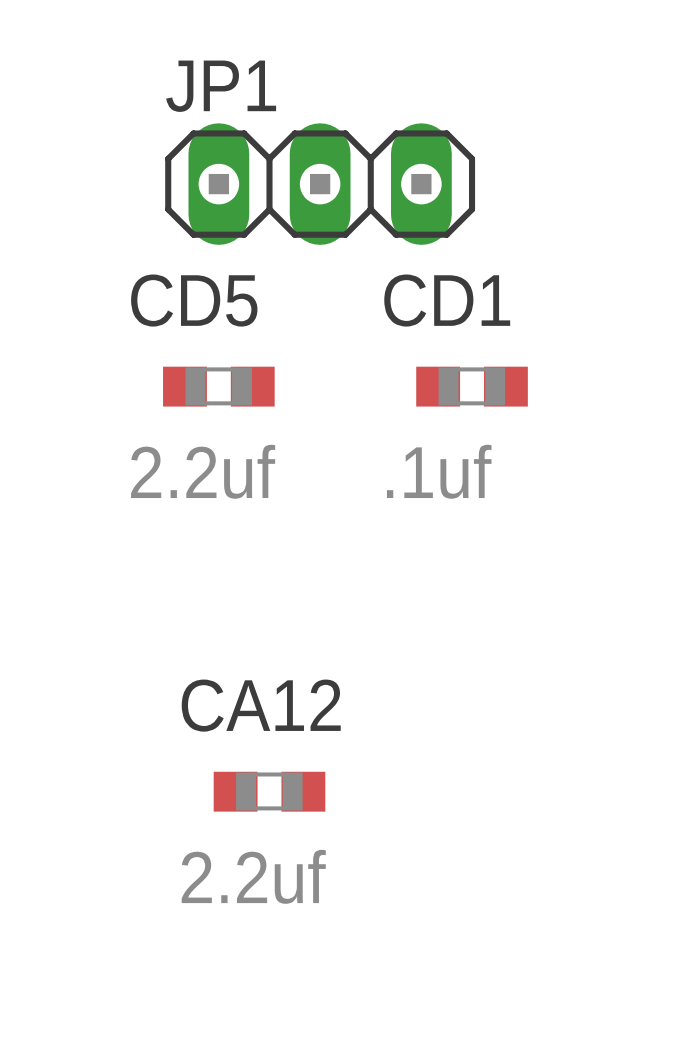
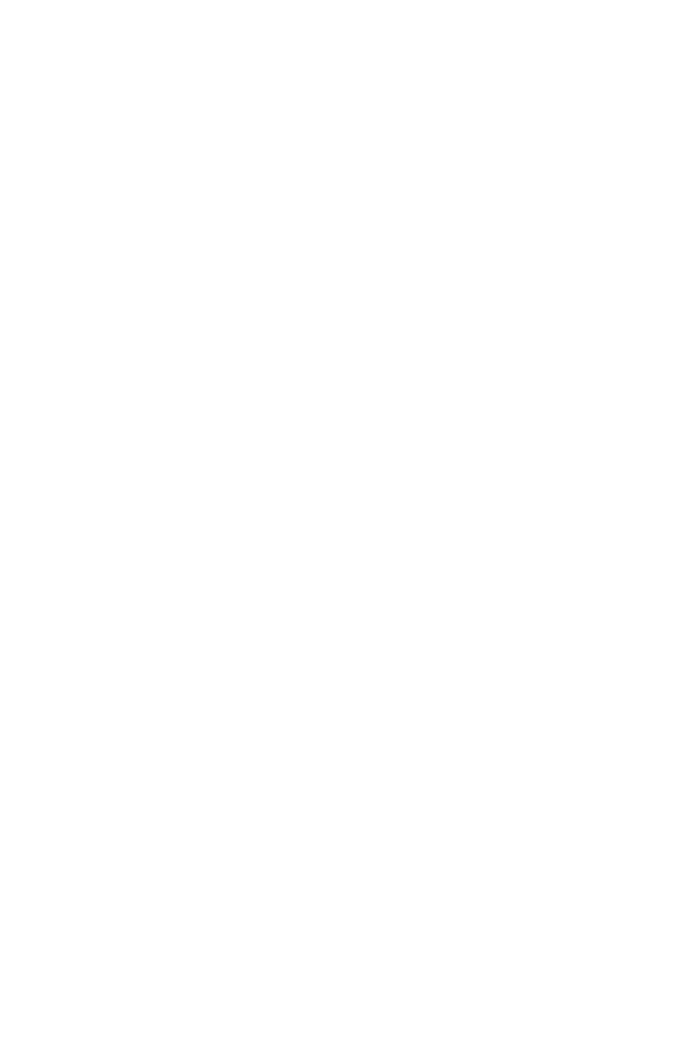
JP1: (320, 184) -> none
CD5: 2.2uf (218, 386) -> none
CD1: .1uf (472, 386) -> none
CA12: 2.2uf (269, 791) -> none

